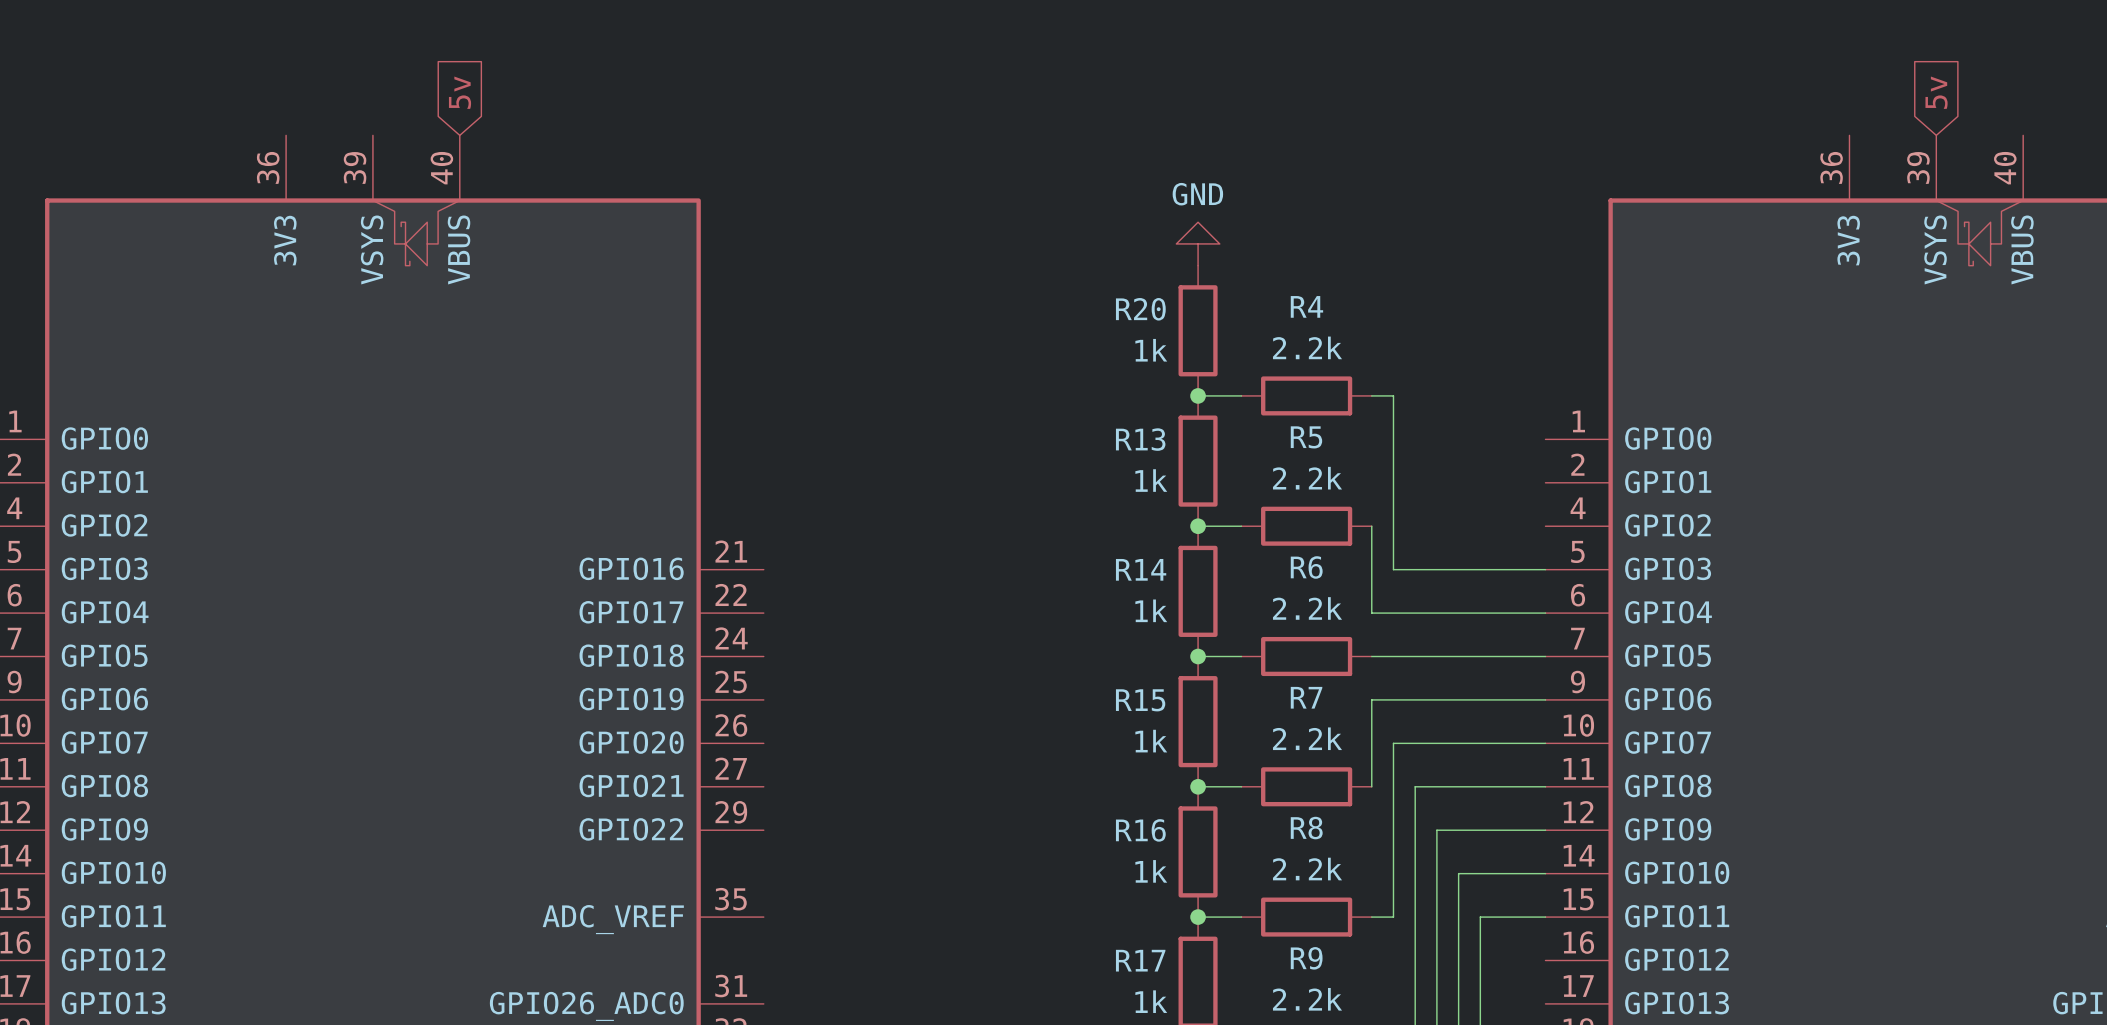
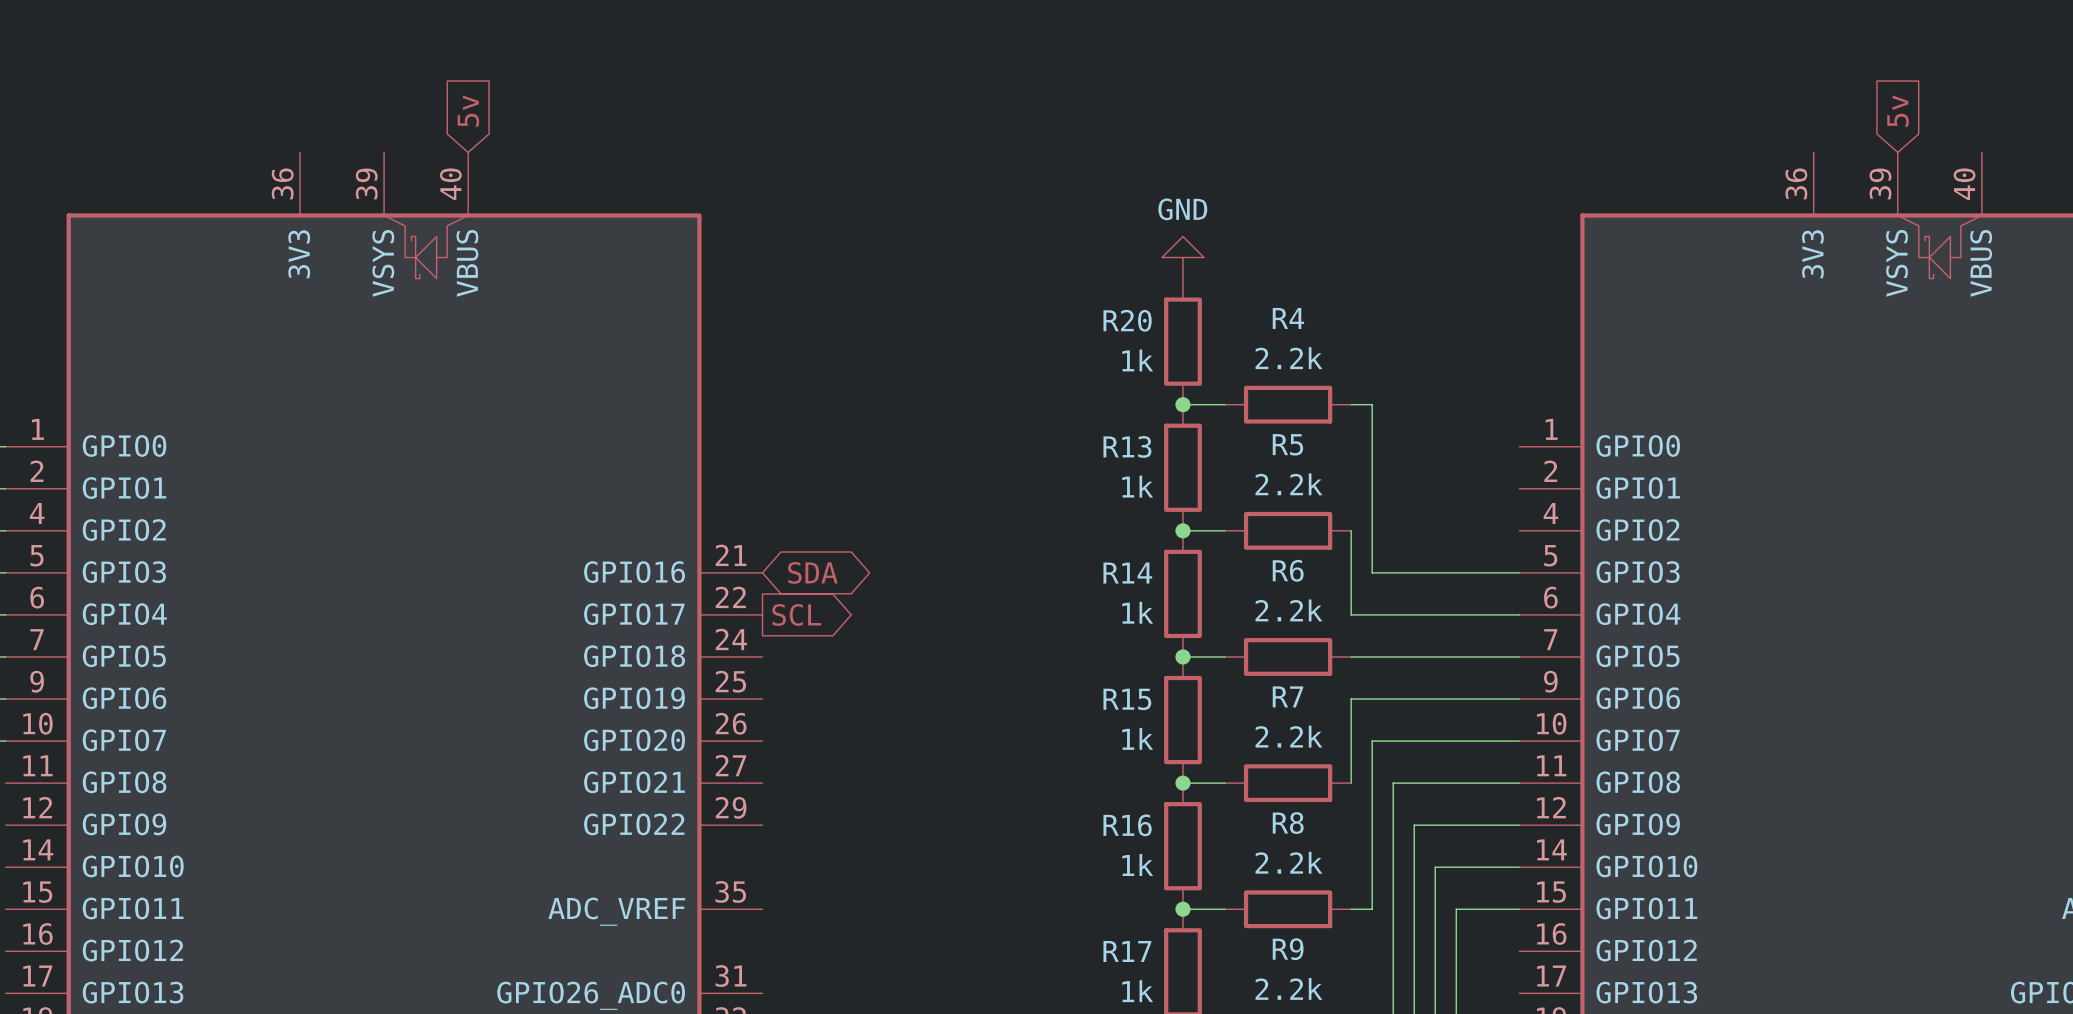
global label: none -> SDA (812, 572)
global label: none -> SCL (796, 614)

